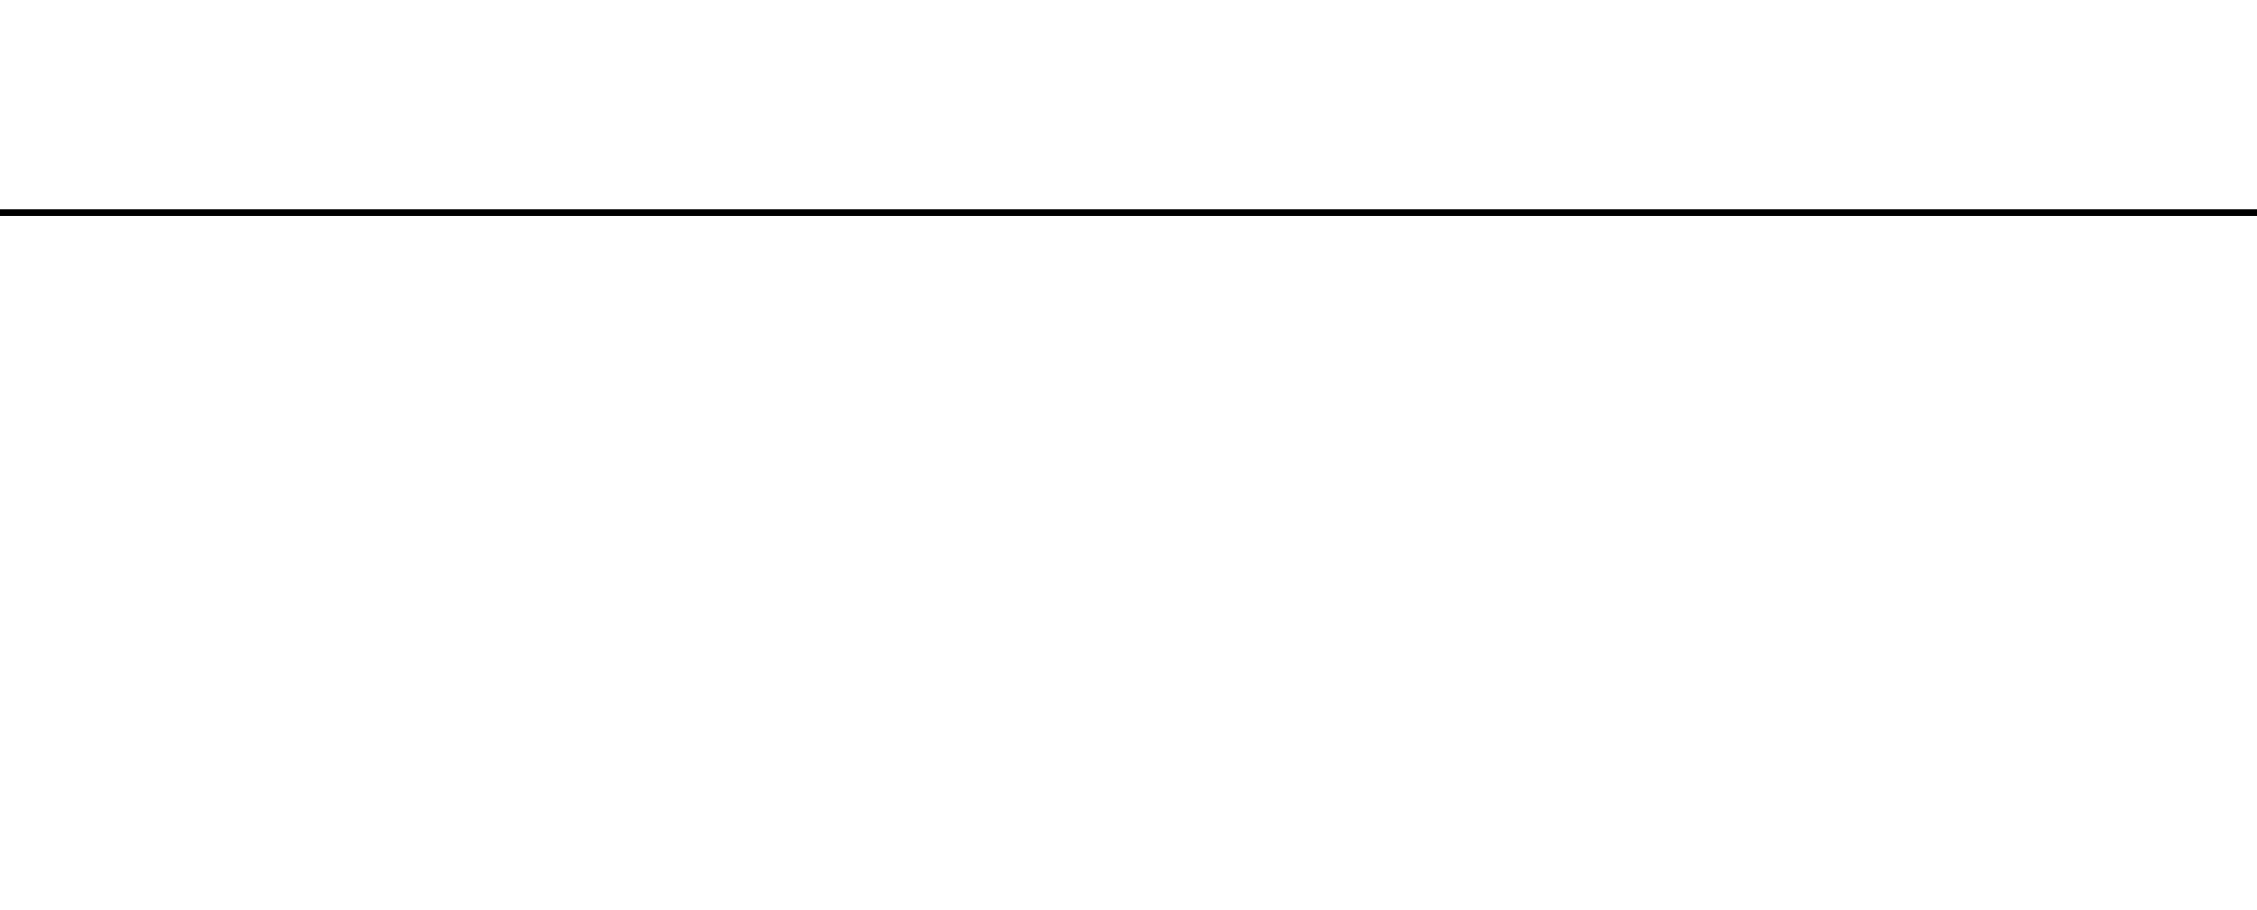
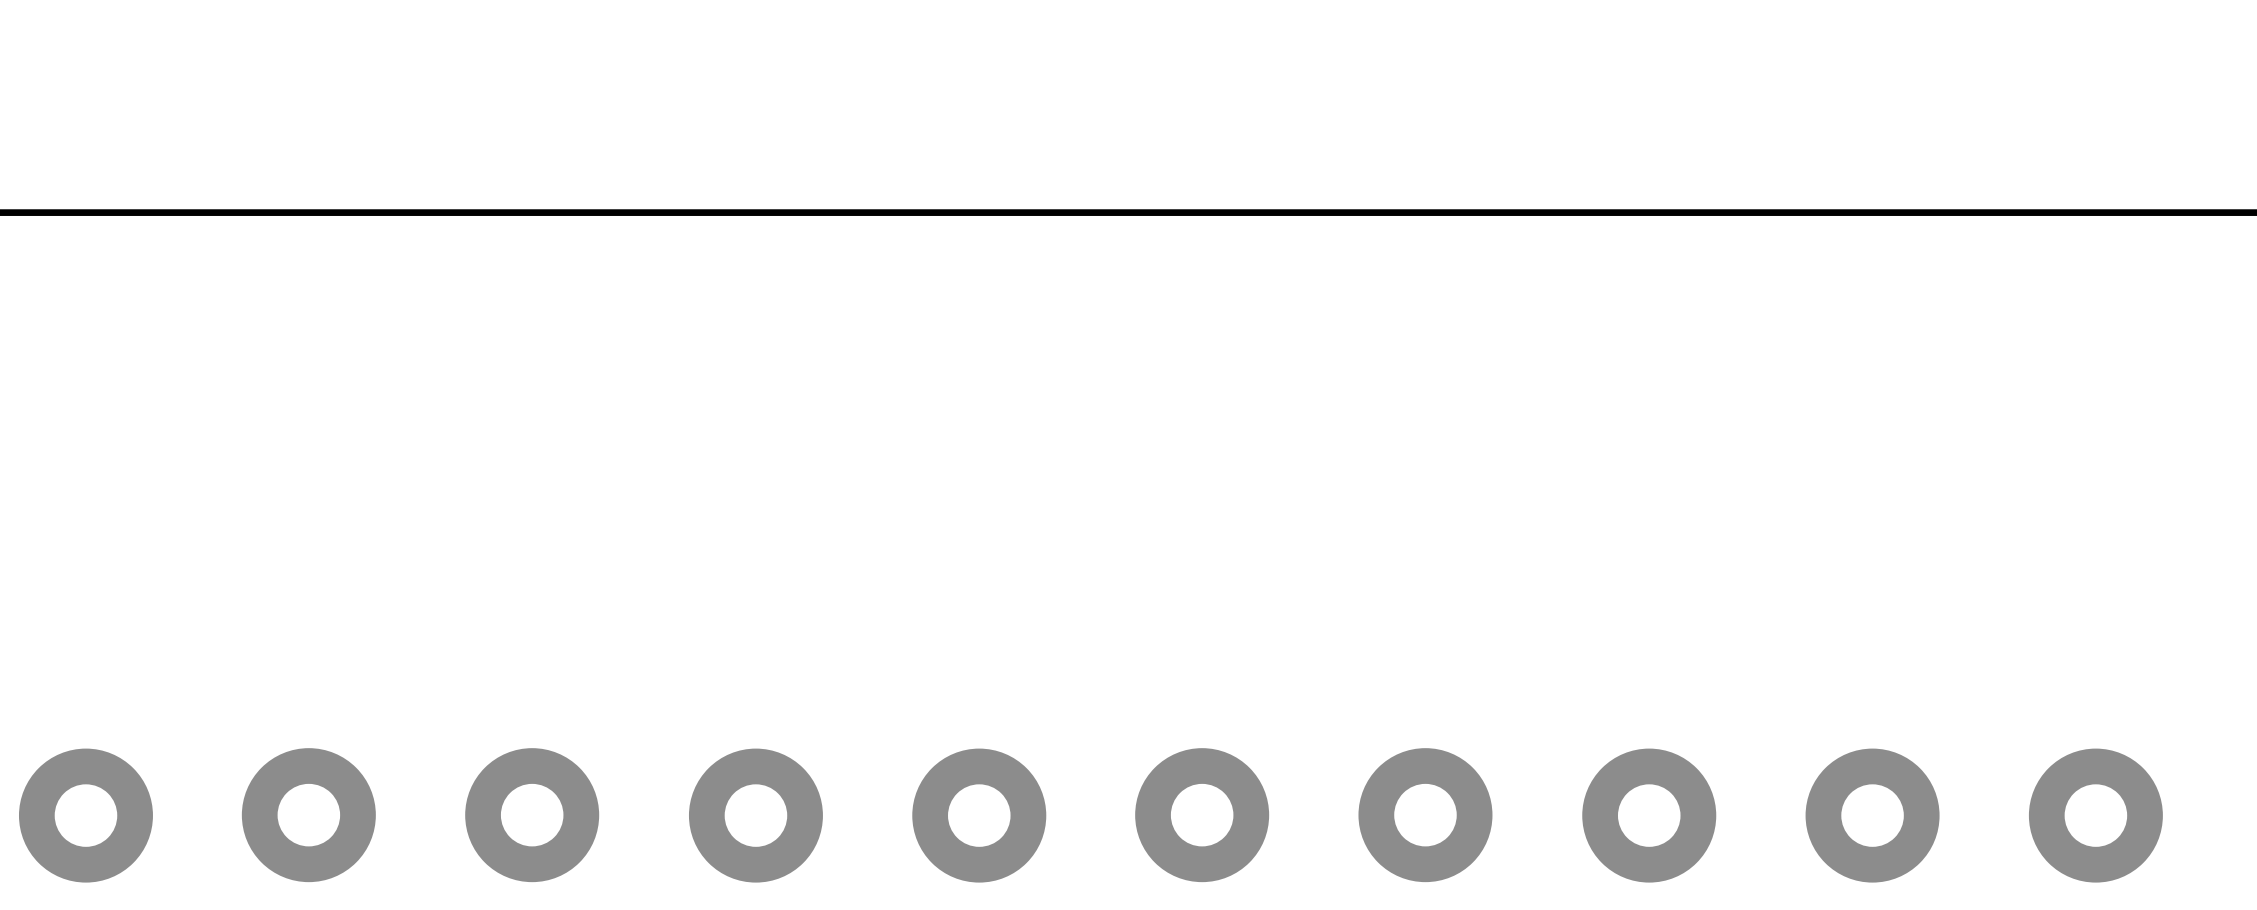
part: none -> (1090, 815)

